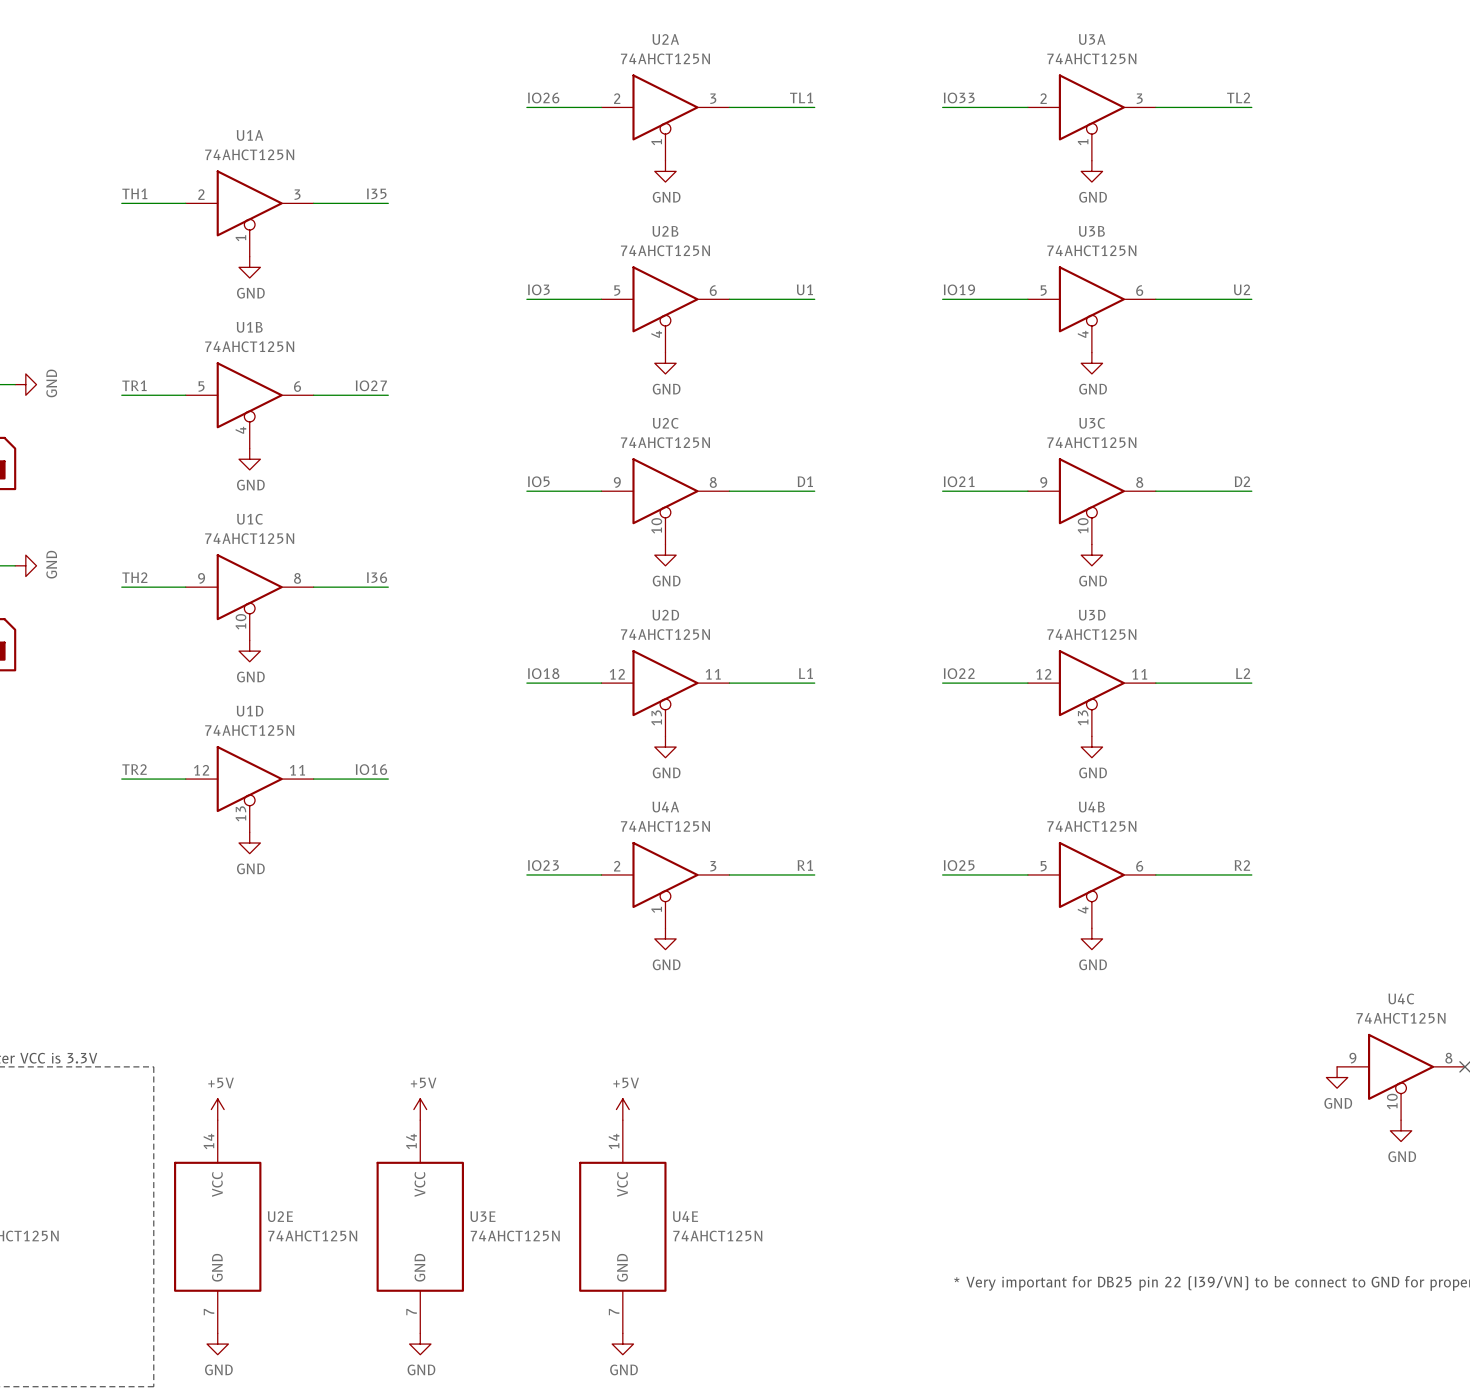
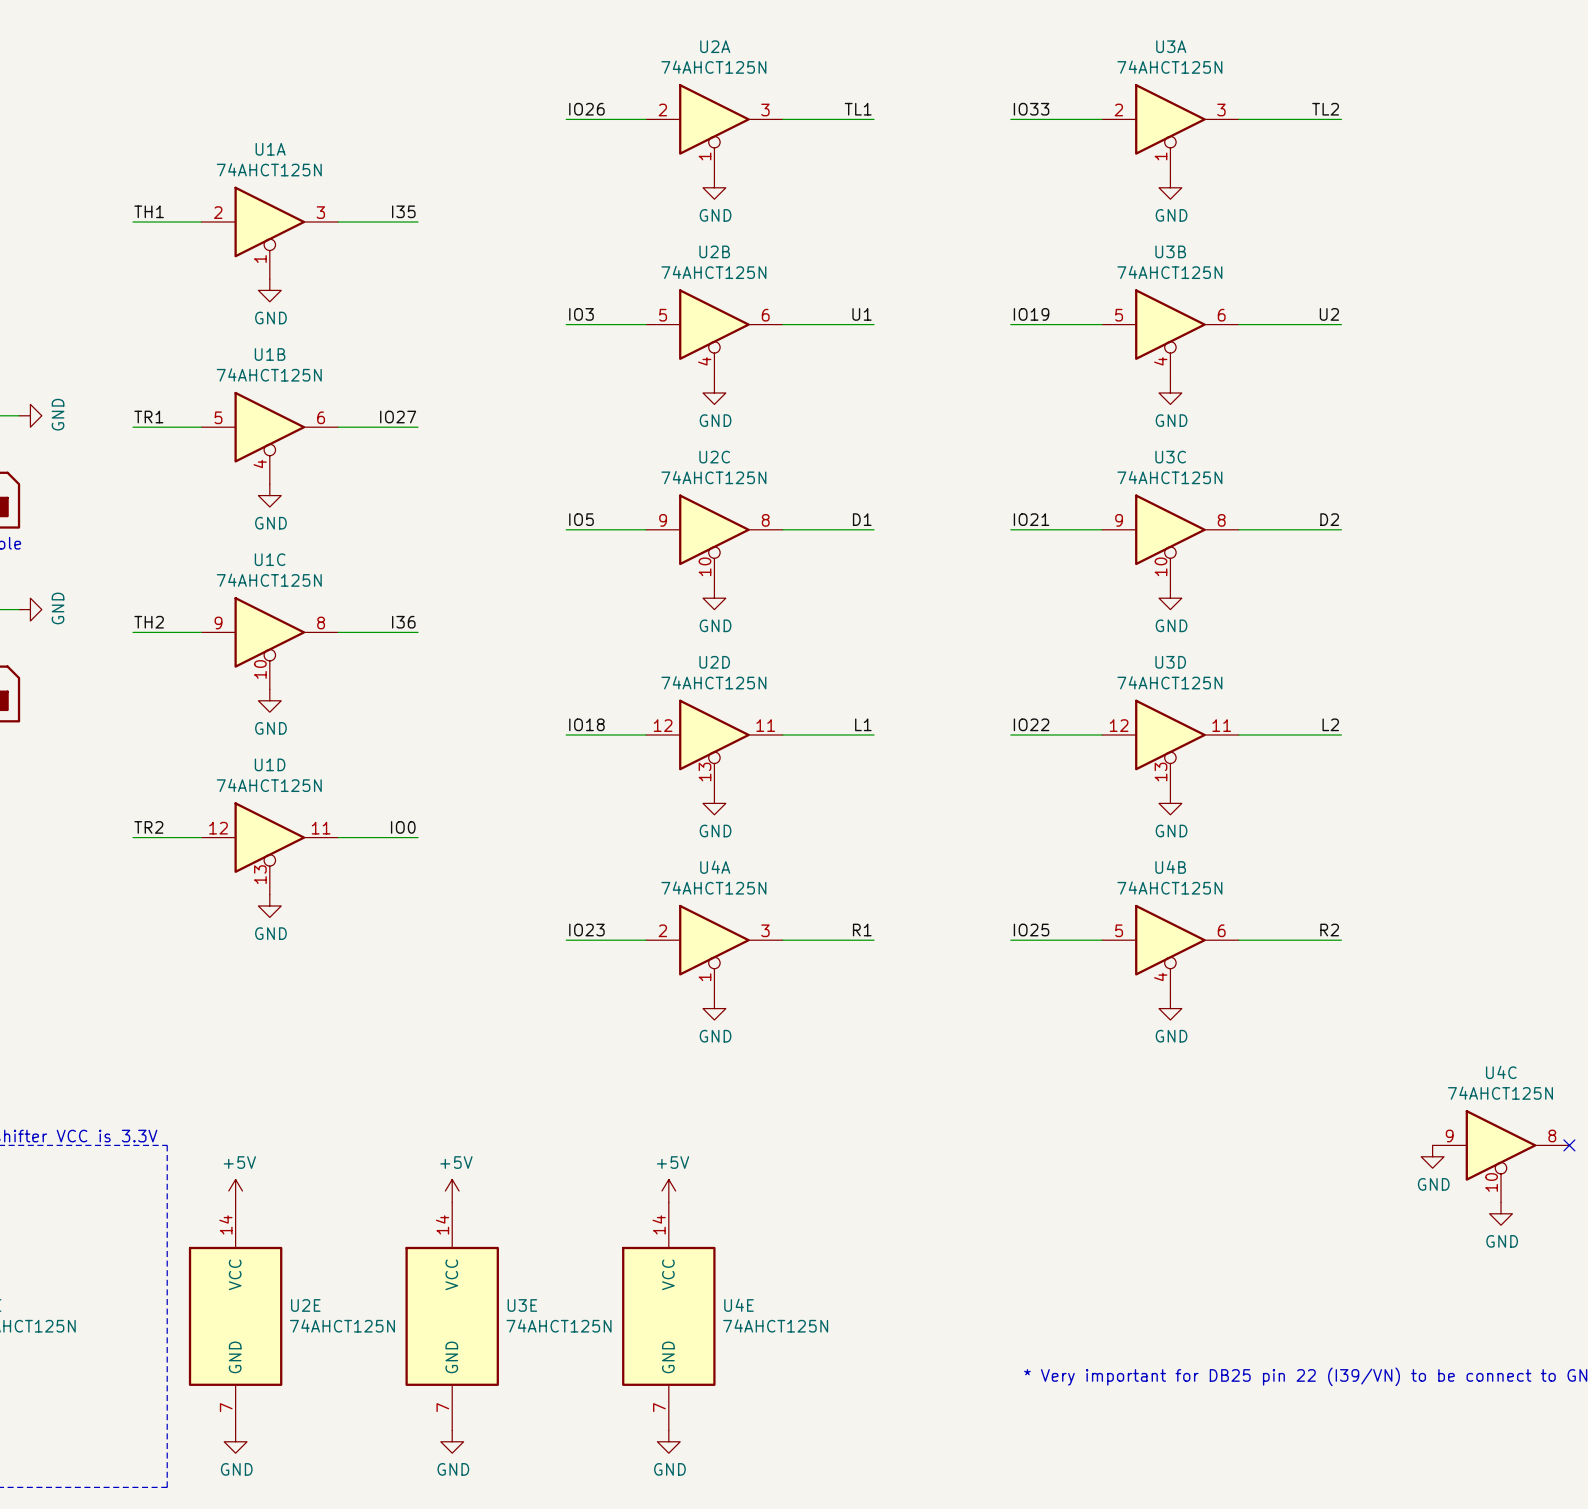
label: IO16 (371, 769) -> IO0 (403, 827)

